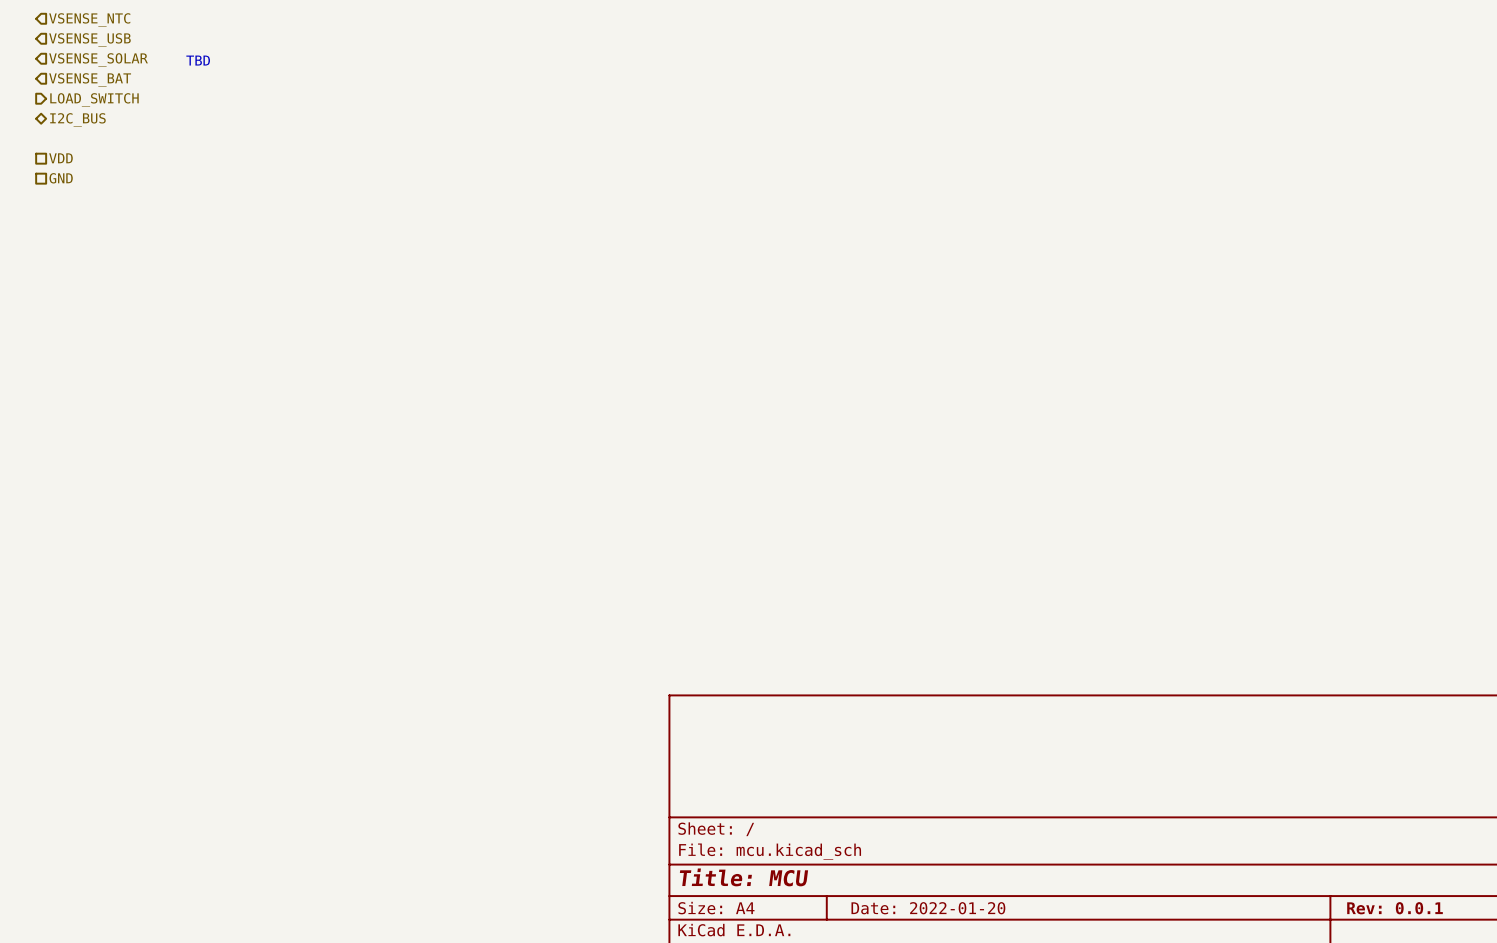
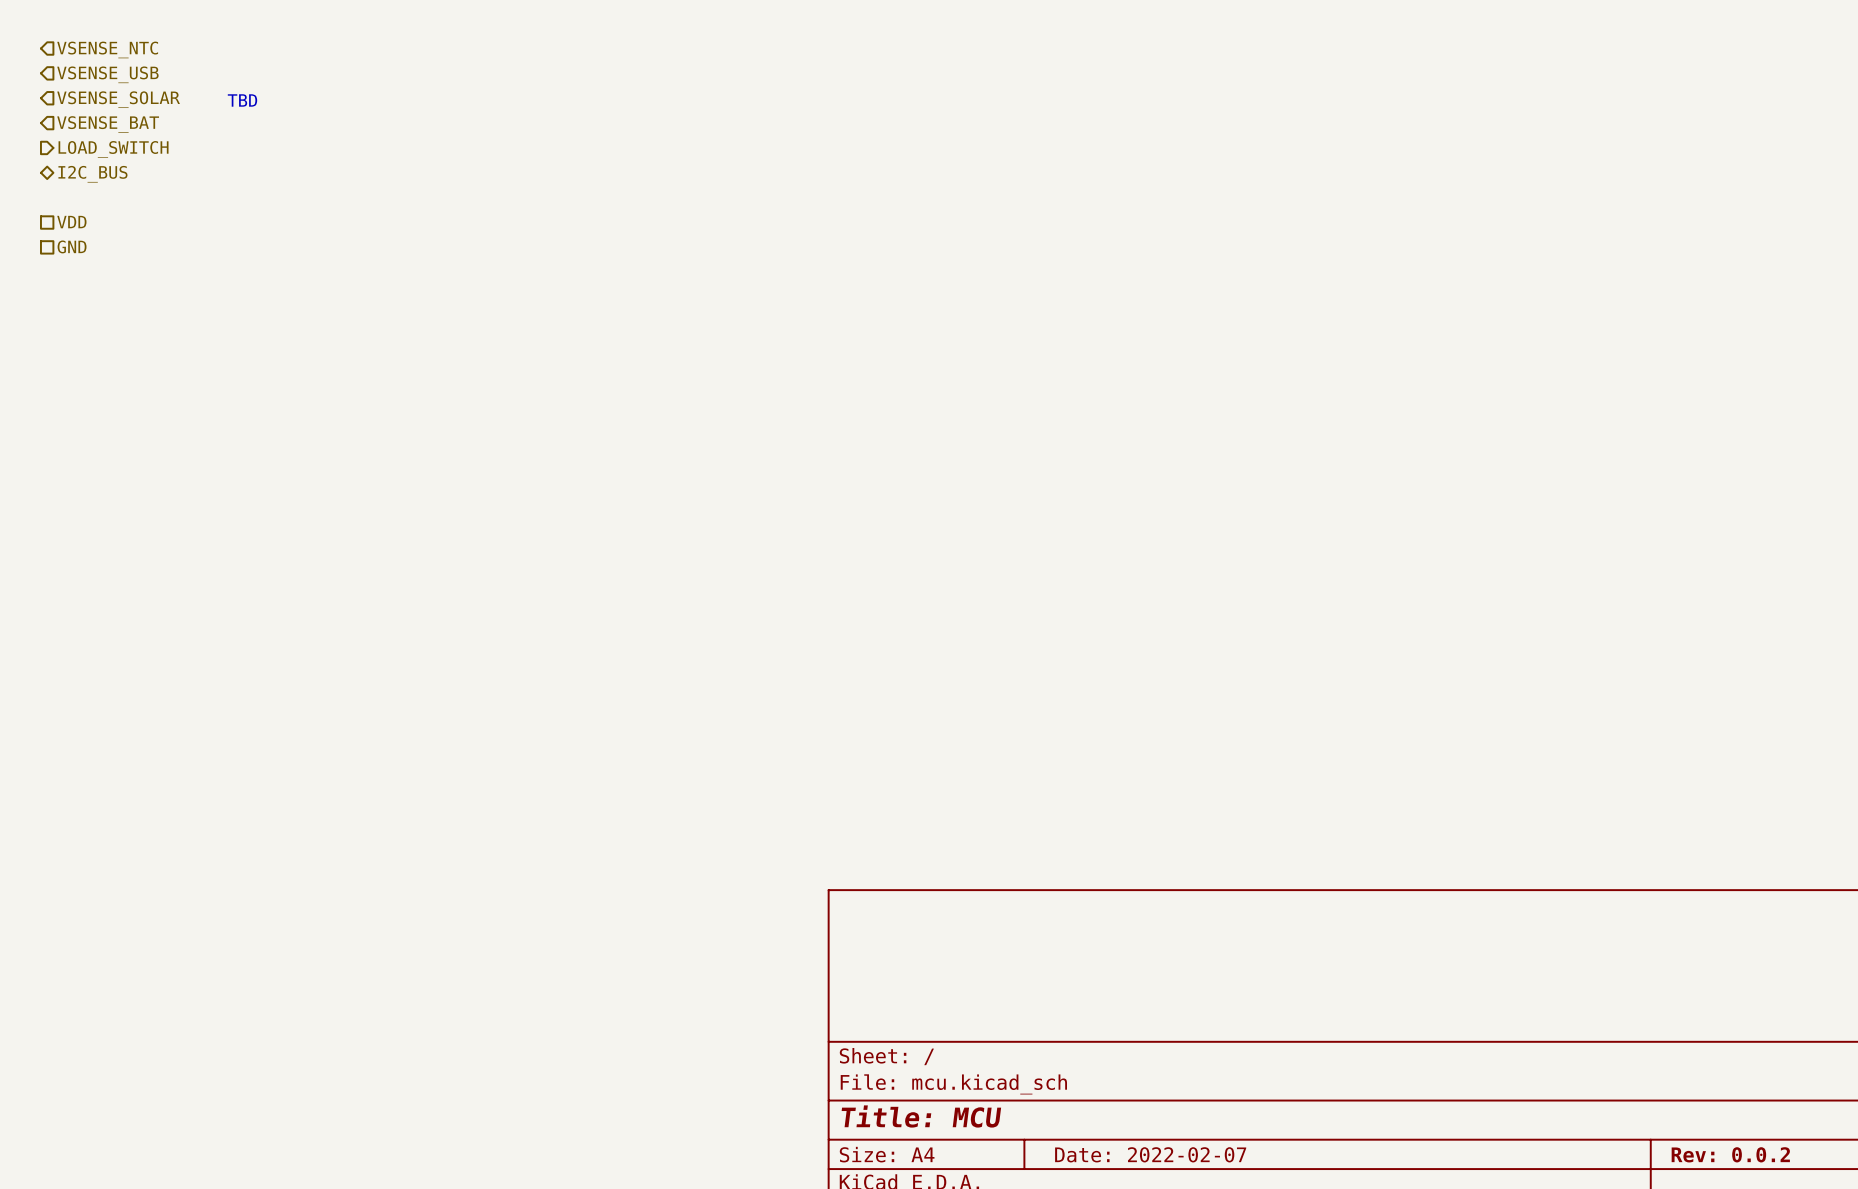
title block: Date: 2022-01-20 (928, 908) -> Date: 2022-02-07 (1150, 1154)
title block: Rev: 0.0.1 (1395, 908) -> Rev: 0.0.2 (1730, 1154)

